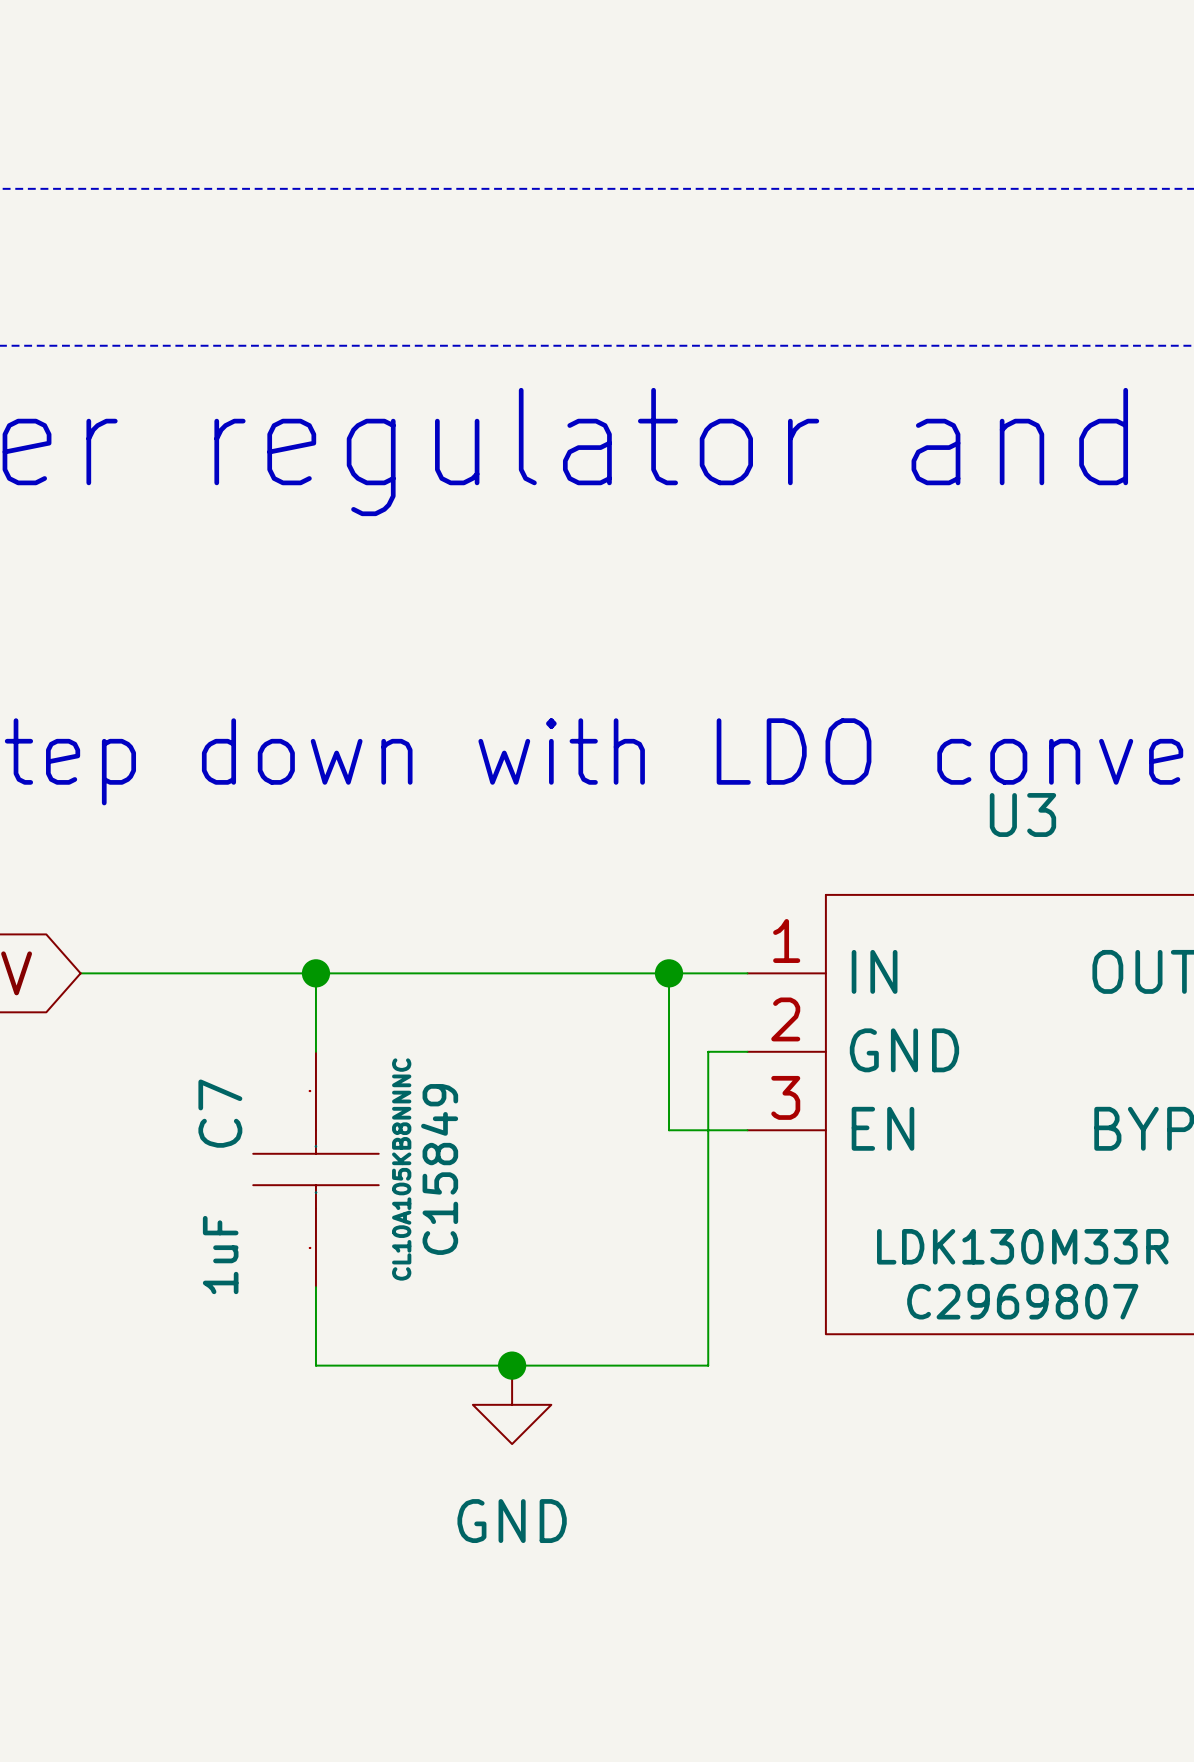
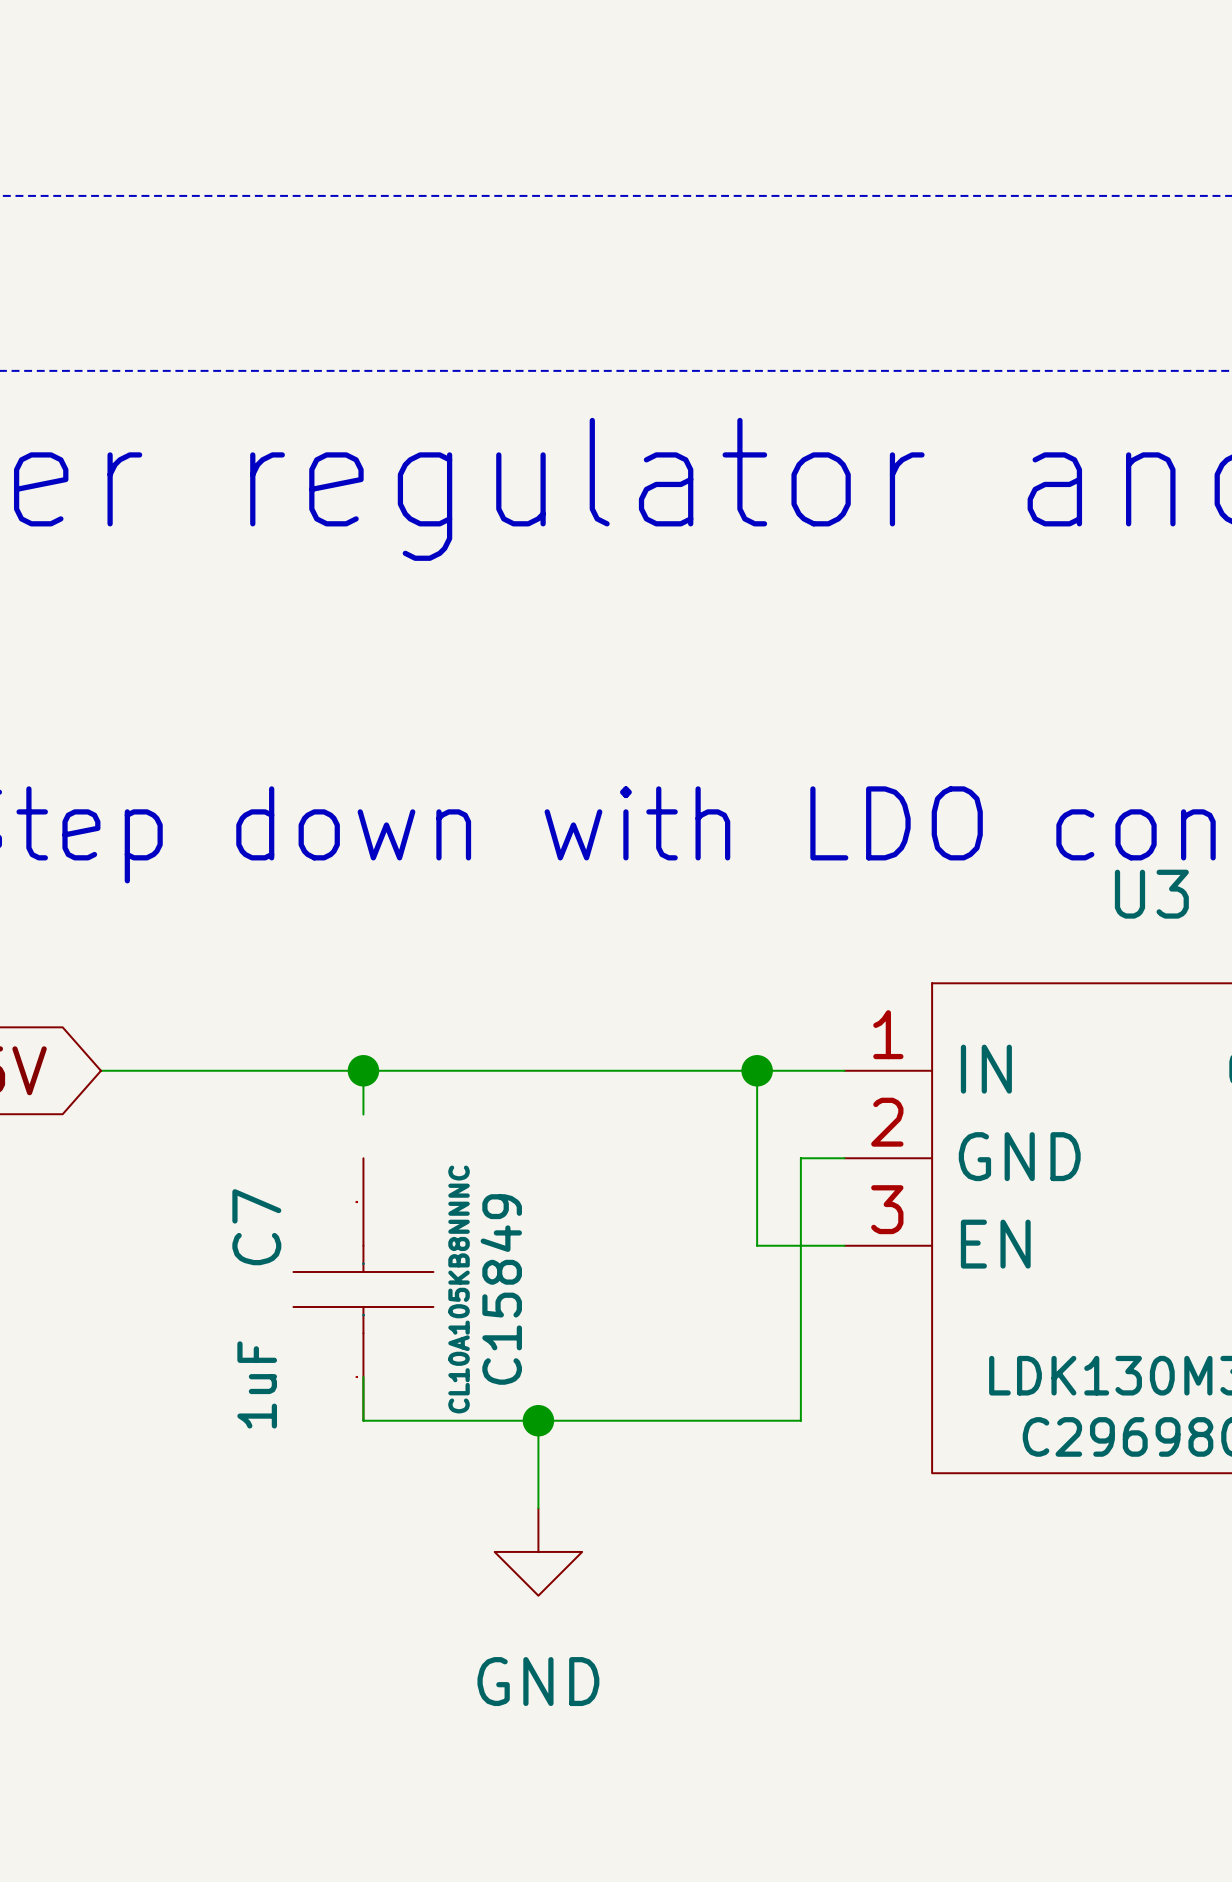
wire: (315, 1012) (315, 1051) -> none
wire: (315, 1287) (315, 1365) (708, 1365) (708, 1287) -> (363, 1376) (363, 1420) (800, 1420)
wire: none -> (538, 1420) (538, 1508)
junction position: (512, 1365) -> (538, 1420)
power symbol position: GND (512, 1404) -> GND (538, 1551)

